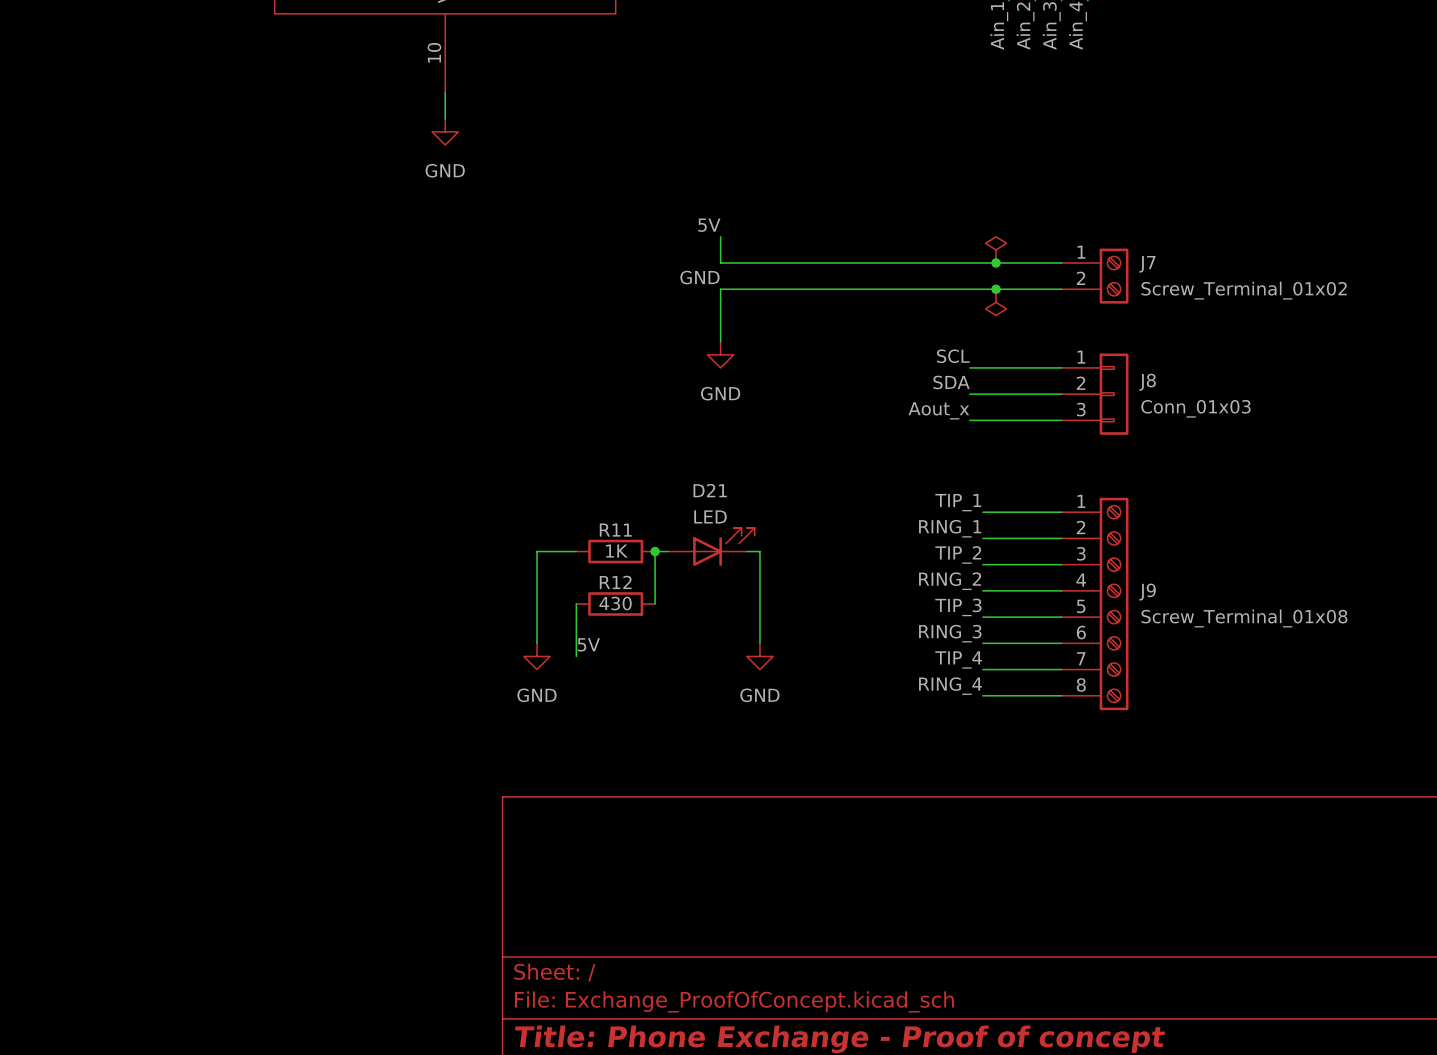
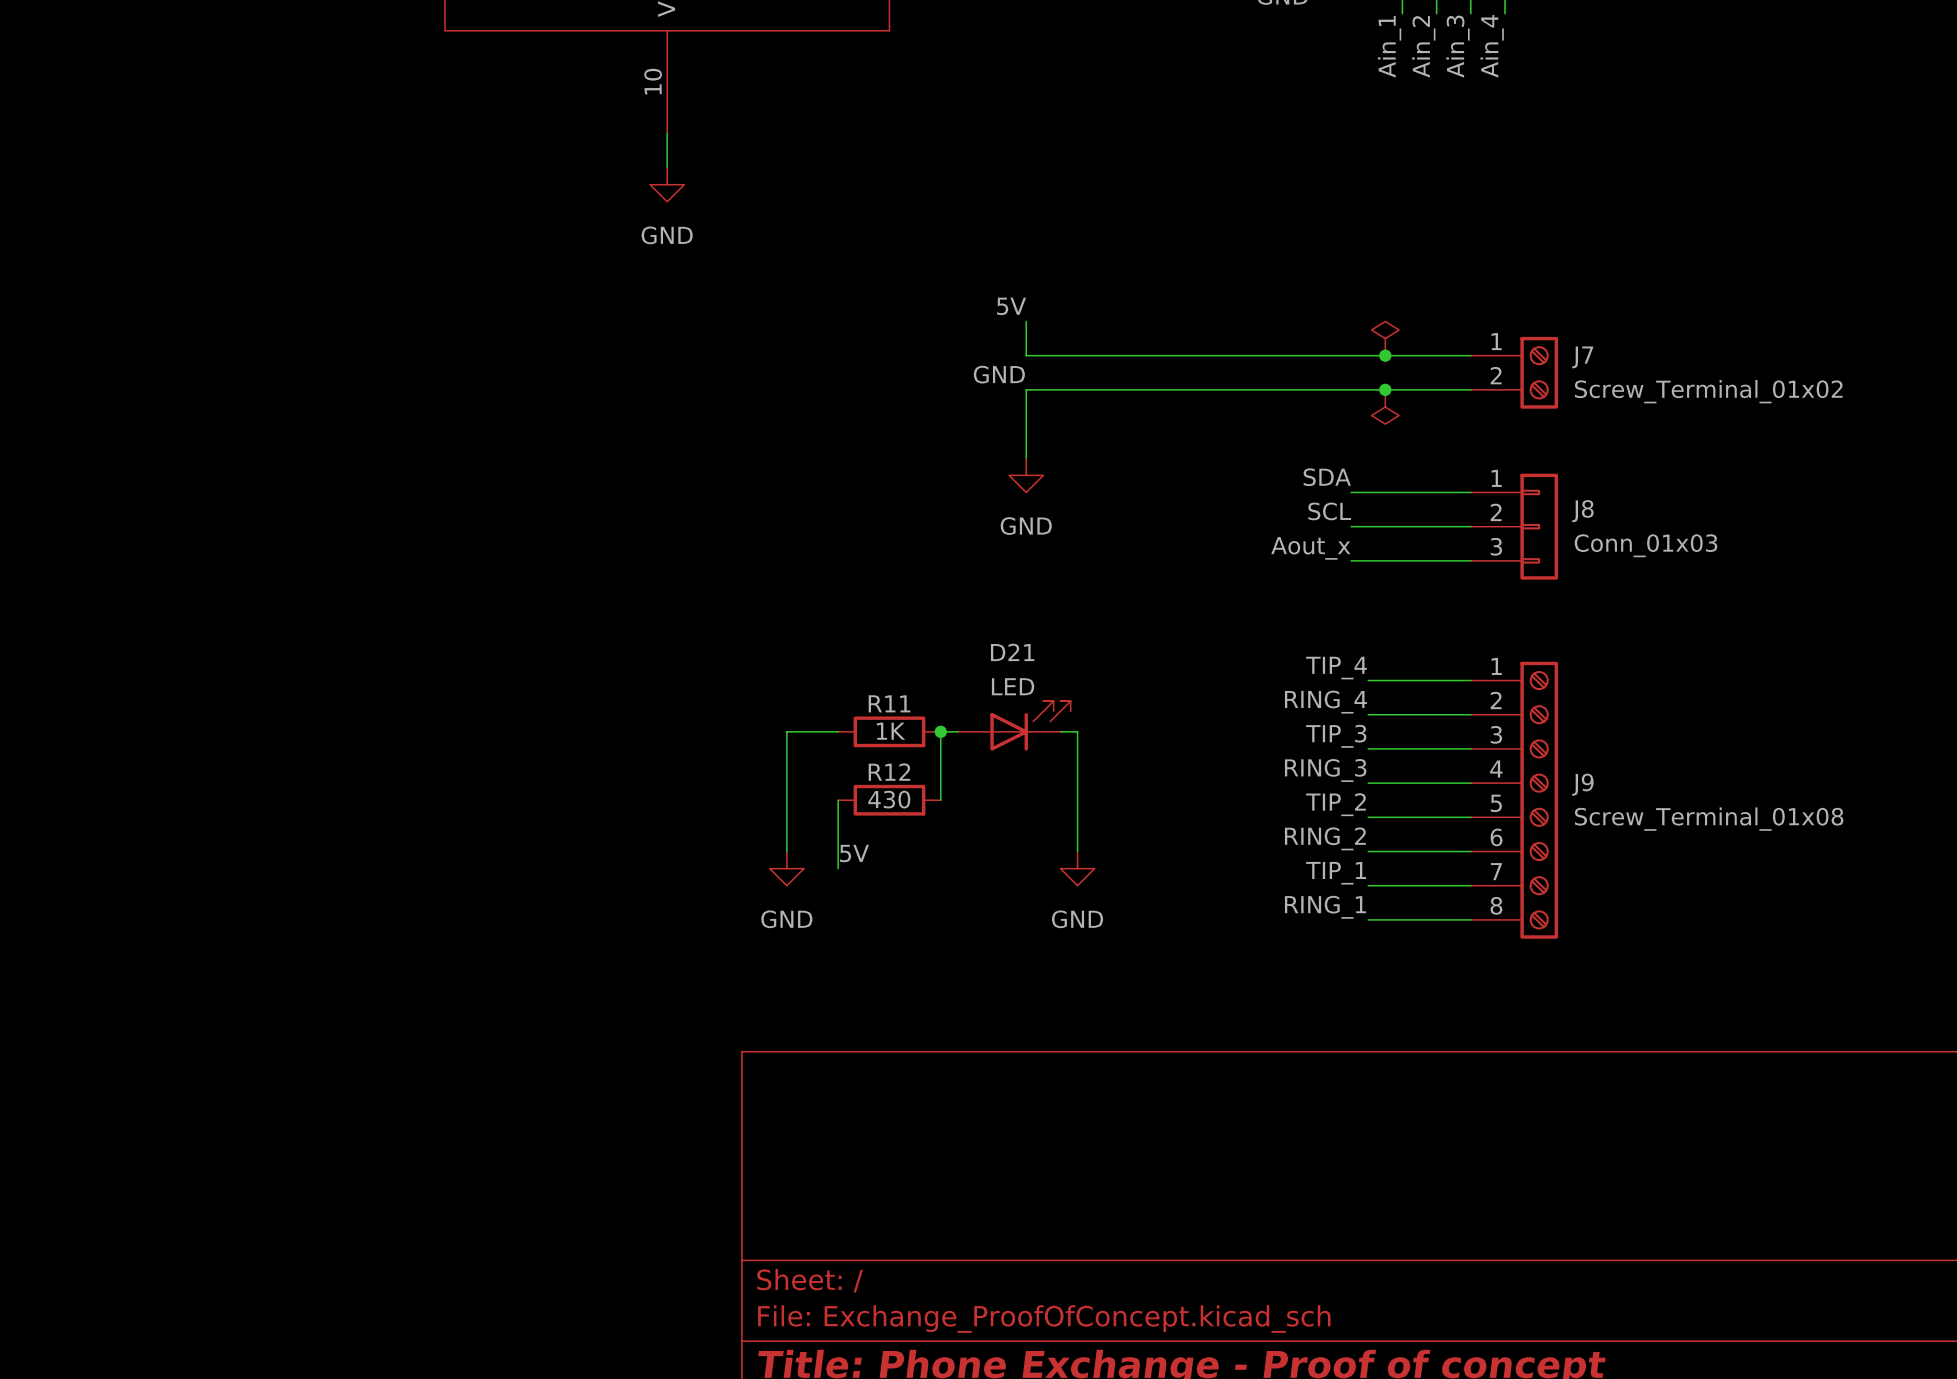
label: SCL (953, 356) -> SDA (1327, 477)
label: SDA (951, 382) -> SCL (1329, 511)
label: TIP_1 (958, 502) -> TIP_4 (1336, 668)
label: RING_1 (950, 528) -> RING_4 (1325, 702)
label: TIP_2 (958, 554) -> TIP_3 (1336, 736)
label: RING_2 (950, 581) -> RING_3 (1325, 770)
label: TIP_3 (958, 607) -> TIP_2 (1335, 804)
label: RING_3 (950, 633) -> RING_2 (1325, 838)
label: TIP_4 (958, 659) -> TIP_1 (1336, 873)
label: RING_4 (950, 686) -> RING_1 (1325, 907)

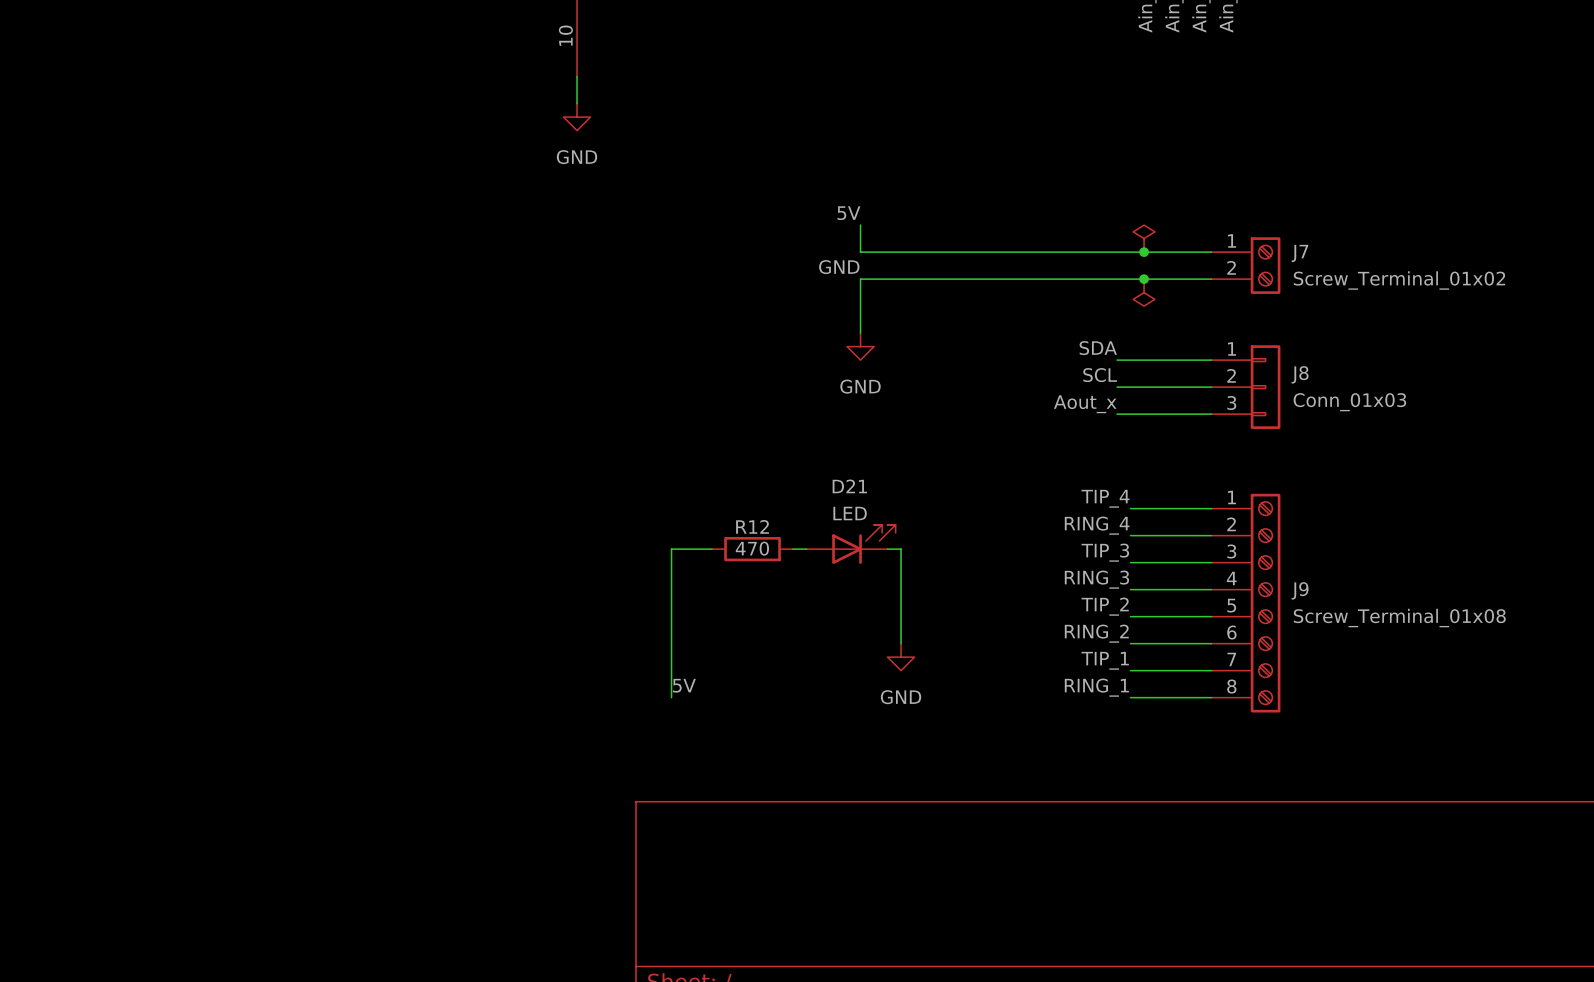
R11 name: R11 (889, 703) -> R12 (752, 526)
R11 value: 1K (891, 731) -> 470 (752, 548)
wire: (940, 731) (940, 800) -> none
junction: (940, 731) -> none
wire: (838, 800) (838, 868) -> (671, 643) (671, 697)
R12: 430 (889, 800) -> none
label position: 5V (854, 853) -> 5V (684, 685)
power symbol: GND (786, 868) -> none

